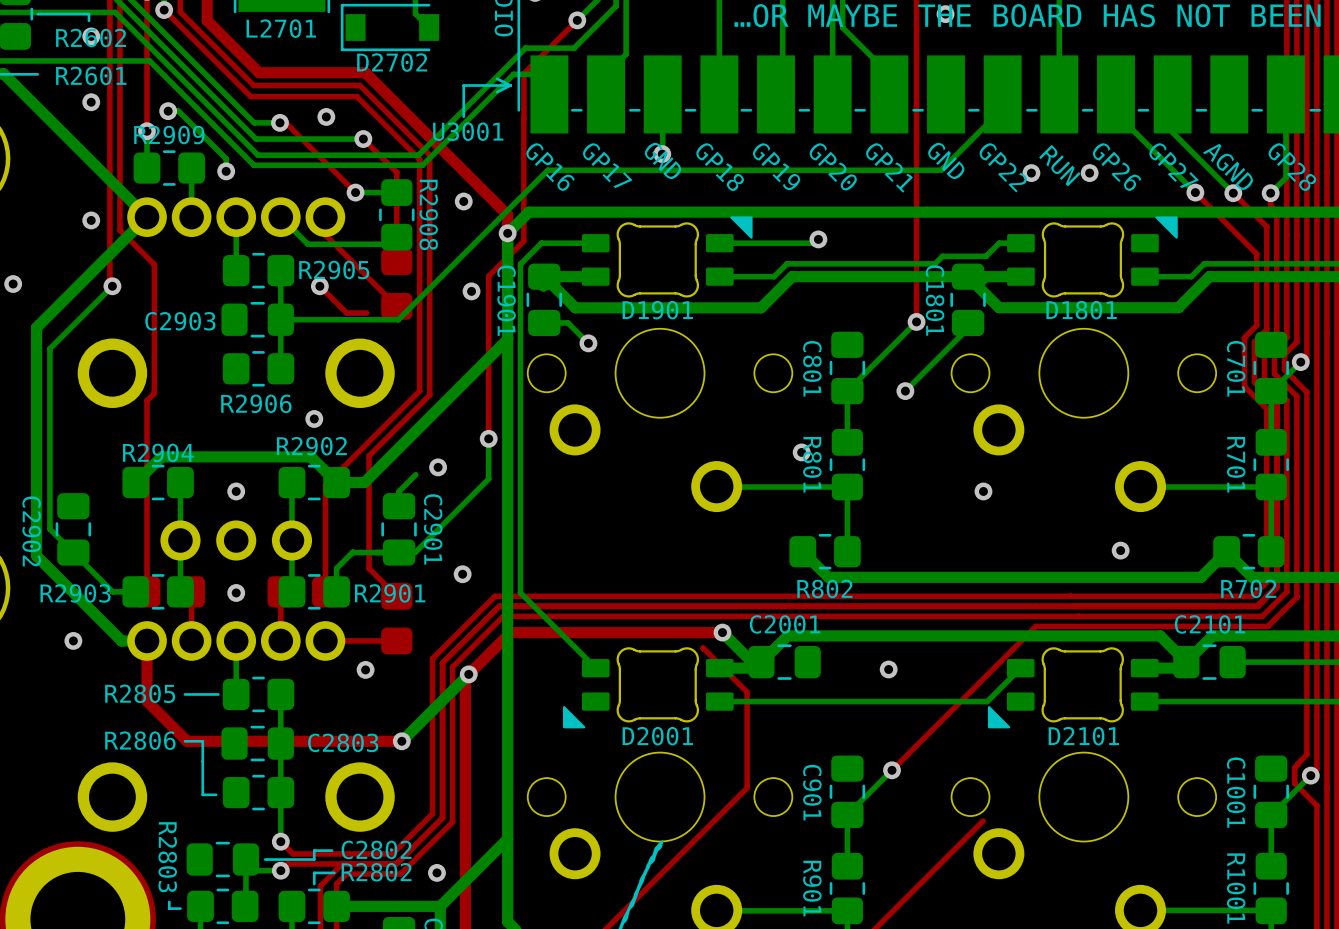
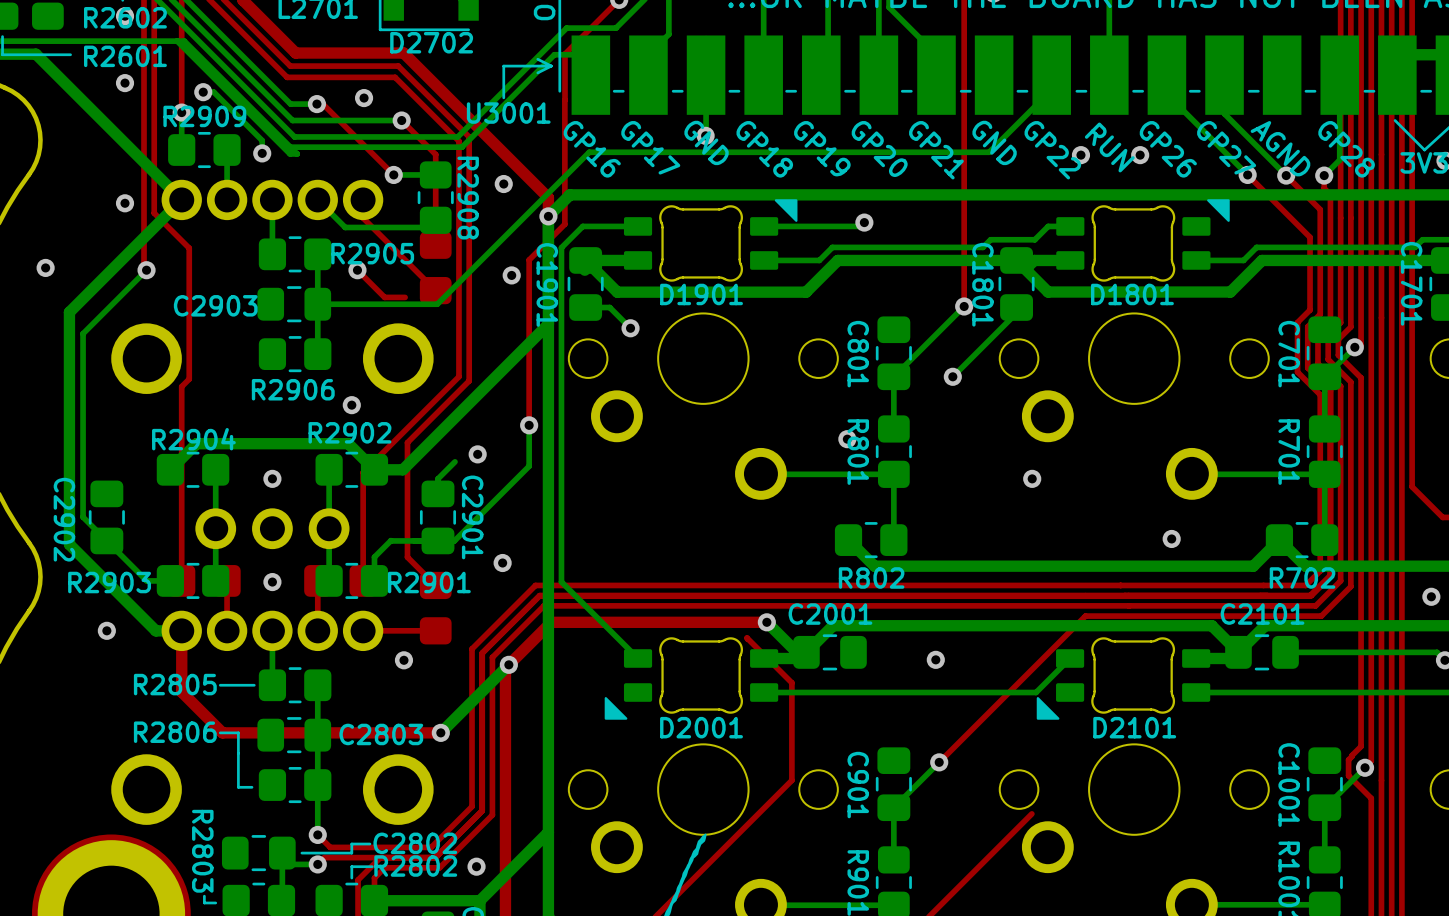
bottom track: none -> (177, 41) (290, 153) (297, 153) (290, 147)

